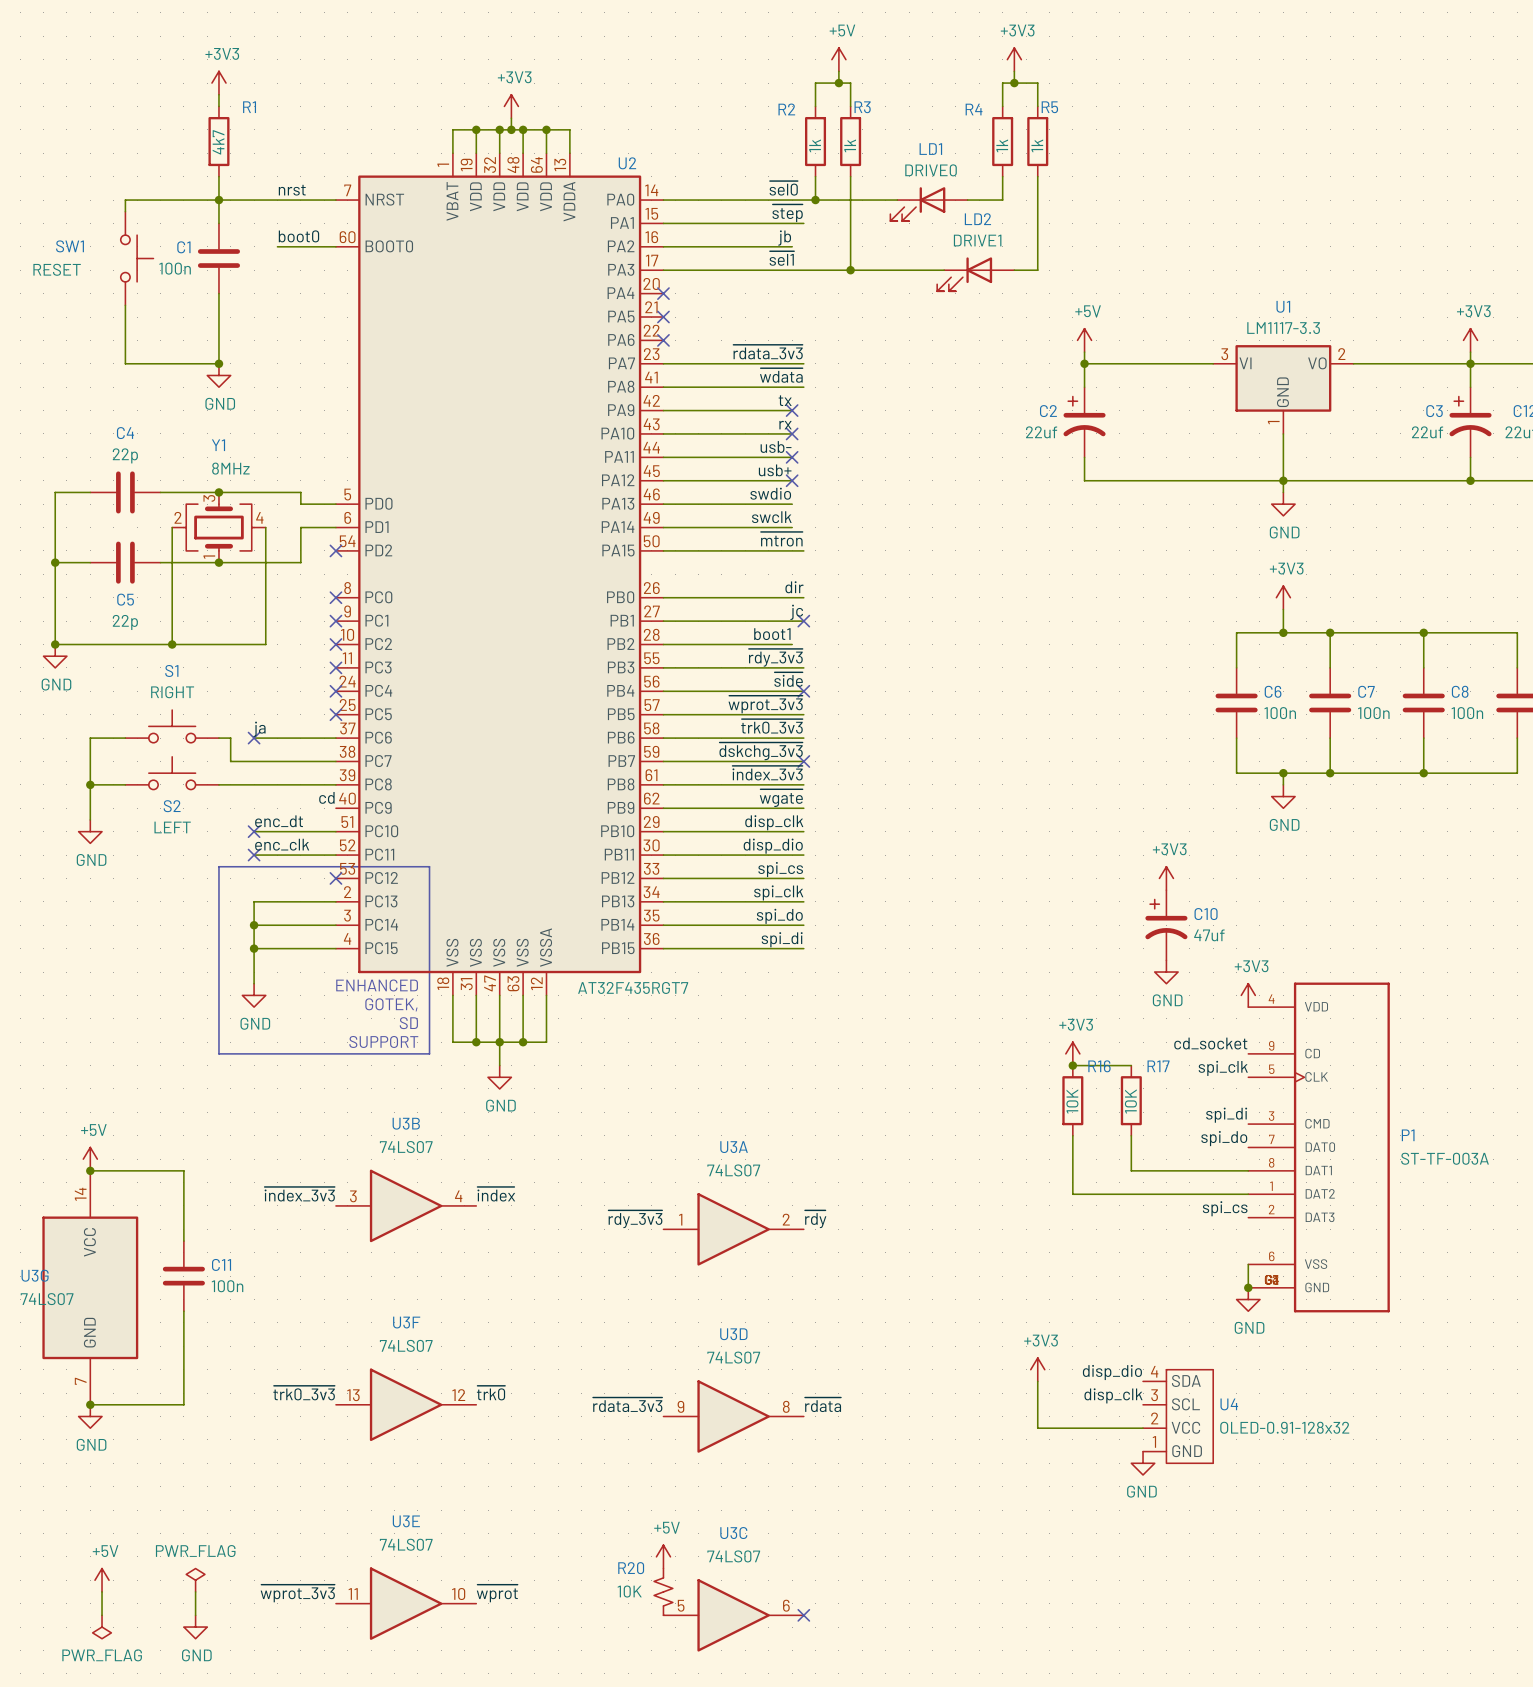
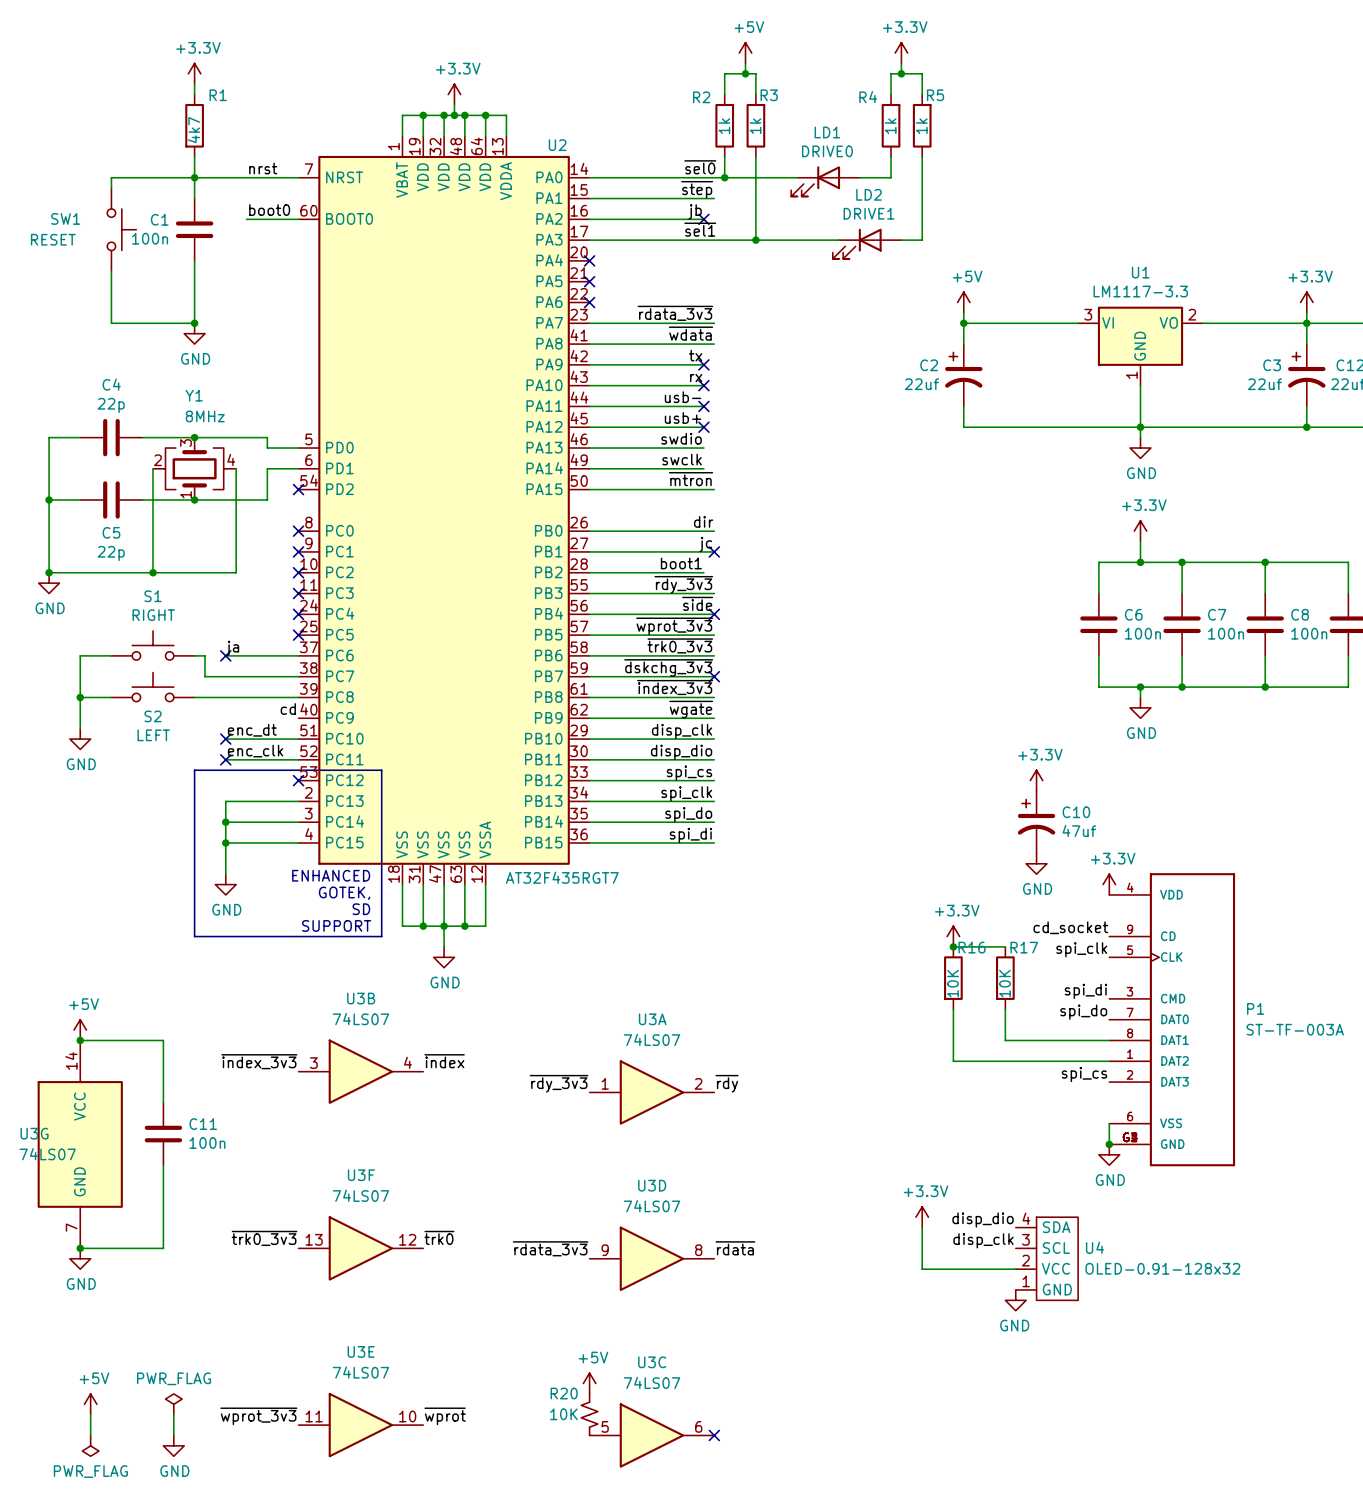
power symbol: +3V3 (1014, 59) -> +3.3V (901, 53)
power symbol: +3V3 (218, 83) -> +3.3V (194, 73)
power symbol: +3V3 (511, 106) -> +3.3V (454, 94)
no-connect mark: none -> (703, 219)
power symbol: +3V3 (1470, 340) -> +3.3V (1306, 302)
power symbol: +3V3 (1283, 597) -> +3.3V (1140, 531)
power symbol: +3V3 (1166, 878) -> +3.3V (1036, 780)
power symbol: +3V3 (1248, 995) -> +3.3V (1109, 884)
power symbol: +3V3 (1072, 1053) -> +3.3V (953, 936)
power symbol: +3V3 (1037, 1369) -> +3.3V (922, 1217)

